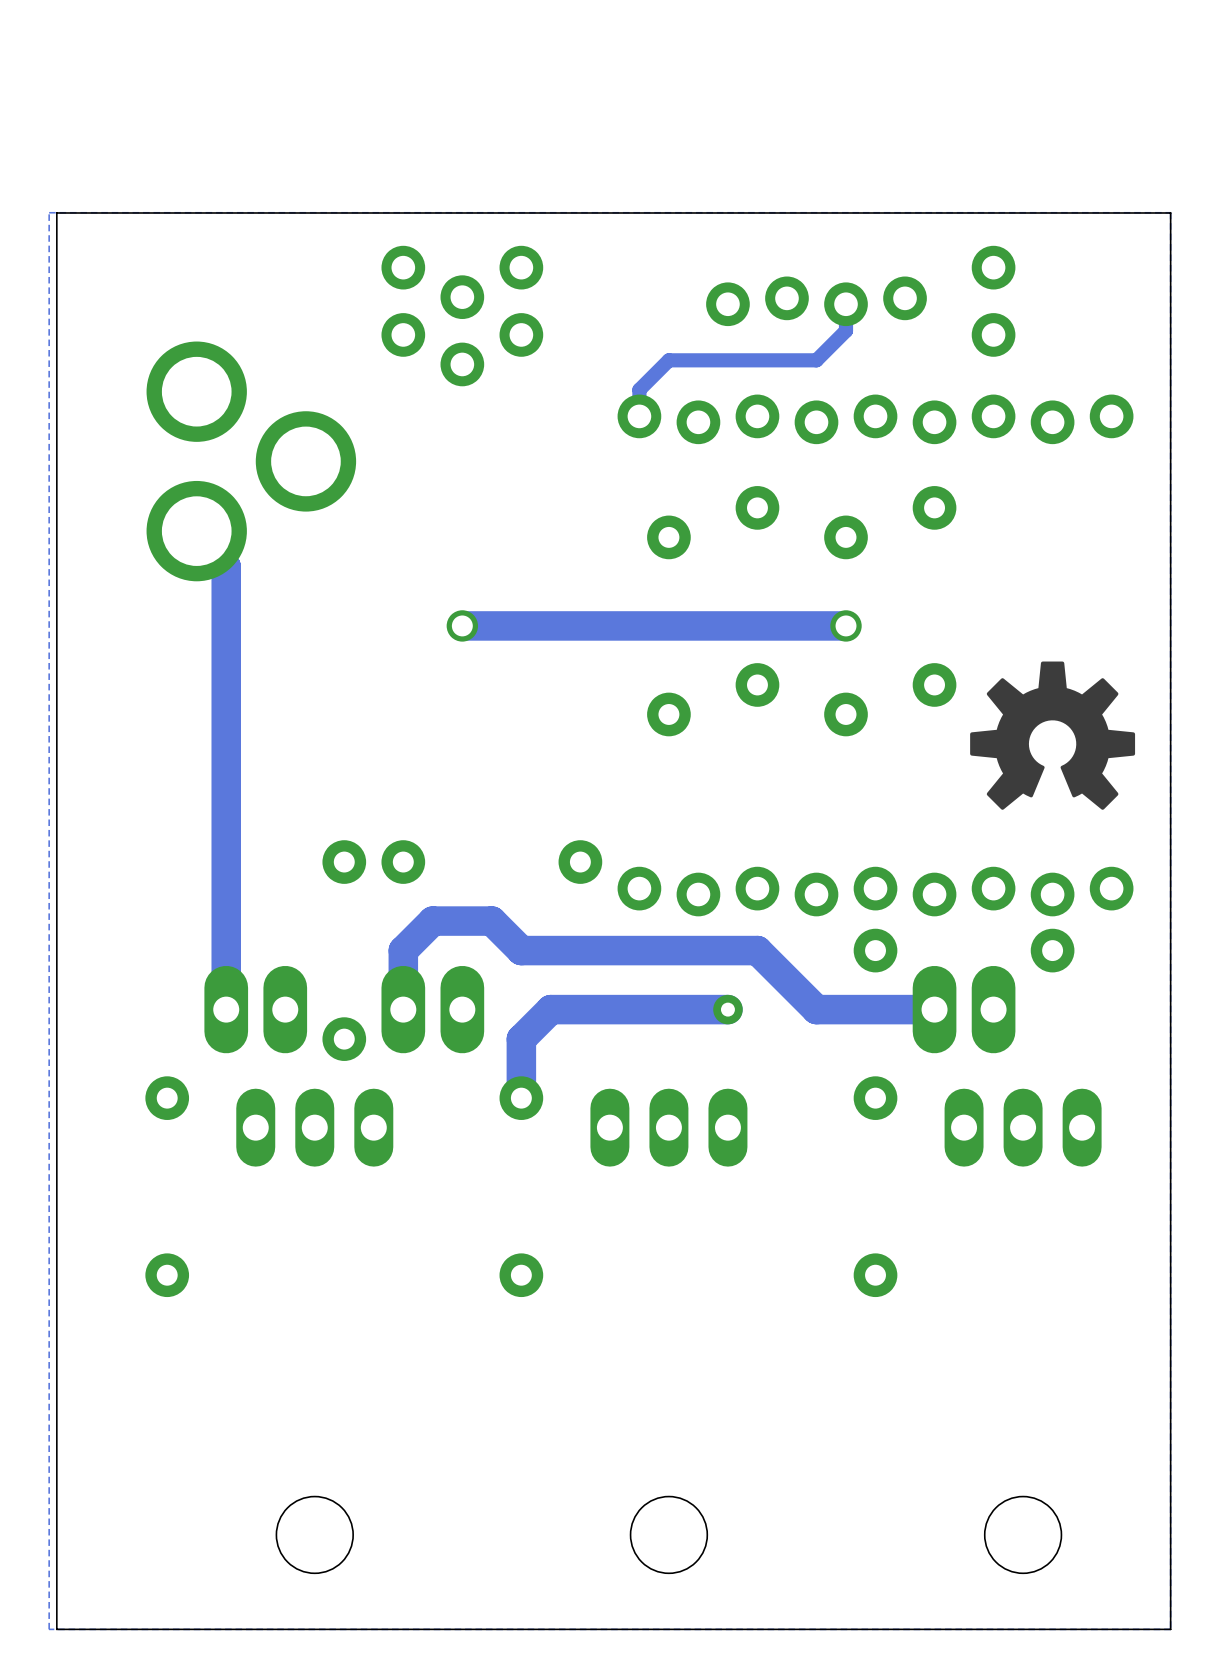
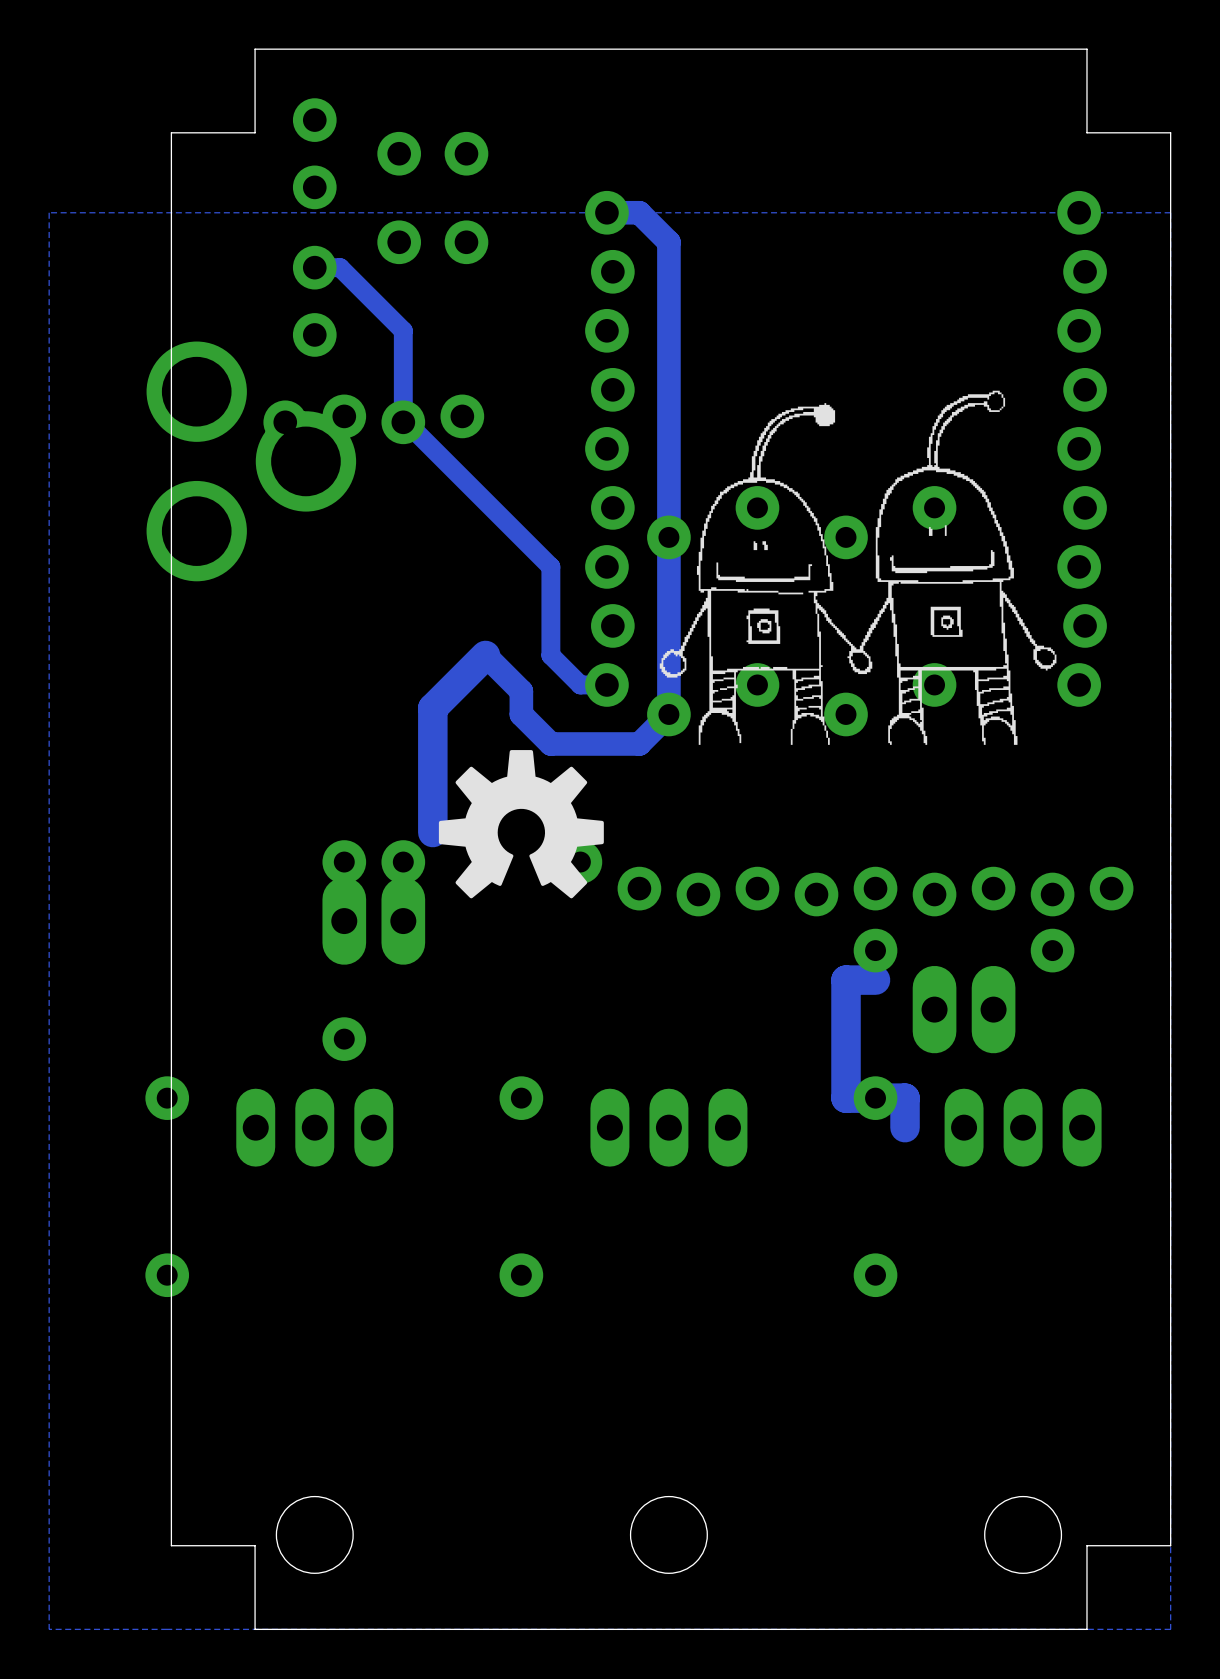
part: none -> (314, 153)
part: none -> (432, 153)
track: none -> (606, 212) (639, 212) (668, 242) (668, 714) (639, 743) (550, 743) (521, 714) (521, 691) (485, 655) (432, 708) (432, 832)
board edge: (1170, 212) (56, 212) (56, 1629) (255, 1629) -> (1170, 212) (1170, 132) (1086, 132) (1086, 49) (255, 49) (255, 132) (171, 132) (171, 1545) (255, 1545) (255, 1629)
part: none -> (432, 242)
track: none -> (314, 267) (340, 267) (403, 330) (403, 422) (406, 422) (550, 566) (550, 655) (580, 684) (606, 684)
part: none -> (314, 301)
part: (403, 301) -> none
part: (521, 301) -> none
part position: (816, 301) -> (373, 419)
part: (993, 301) -> none
track: (846, 304) (846, 330) (816, 360) (668, 360) (639, 389) (639, 416) -> none
part: (462, 330) -> none
drawing: none -> [659, 390, 1057, 745]
part: (875, 419) -> none
part: none -> (609, 448)
part: none -> (1082, 448)
track: (196, 531) (226, 566) (226, 1009) -> none
via: (462, 625) -> none
track: (846, 625) (462, 625) -> none
via: (846, 625) -> none
drawing position: (1052, 735) -> (521, 824)
part: none -> (373, 921)
track: none -> (875, 980) (846, 980) (846, 1098) (905, 1098) (905, 1127)
part: (255, 1009) -> none
part: (432, 1009) -> none
track: (727, 1009) (550, 1009) (521, 1039) (521, 1098) -> none
via: (727, 1009) -> none
track: (934, 1009) (816, 1009) (757, 950) (521, 950) (491, 921) (432, 921) (403, 950) (403, 1009) -> none
board edge: (1170, 1545) (1170, 1629) (1086, 1629) -> (1170, 1545) (1086, 1545) (1086, 1629)

